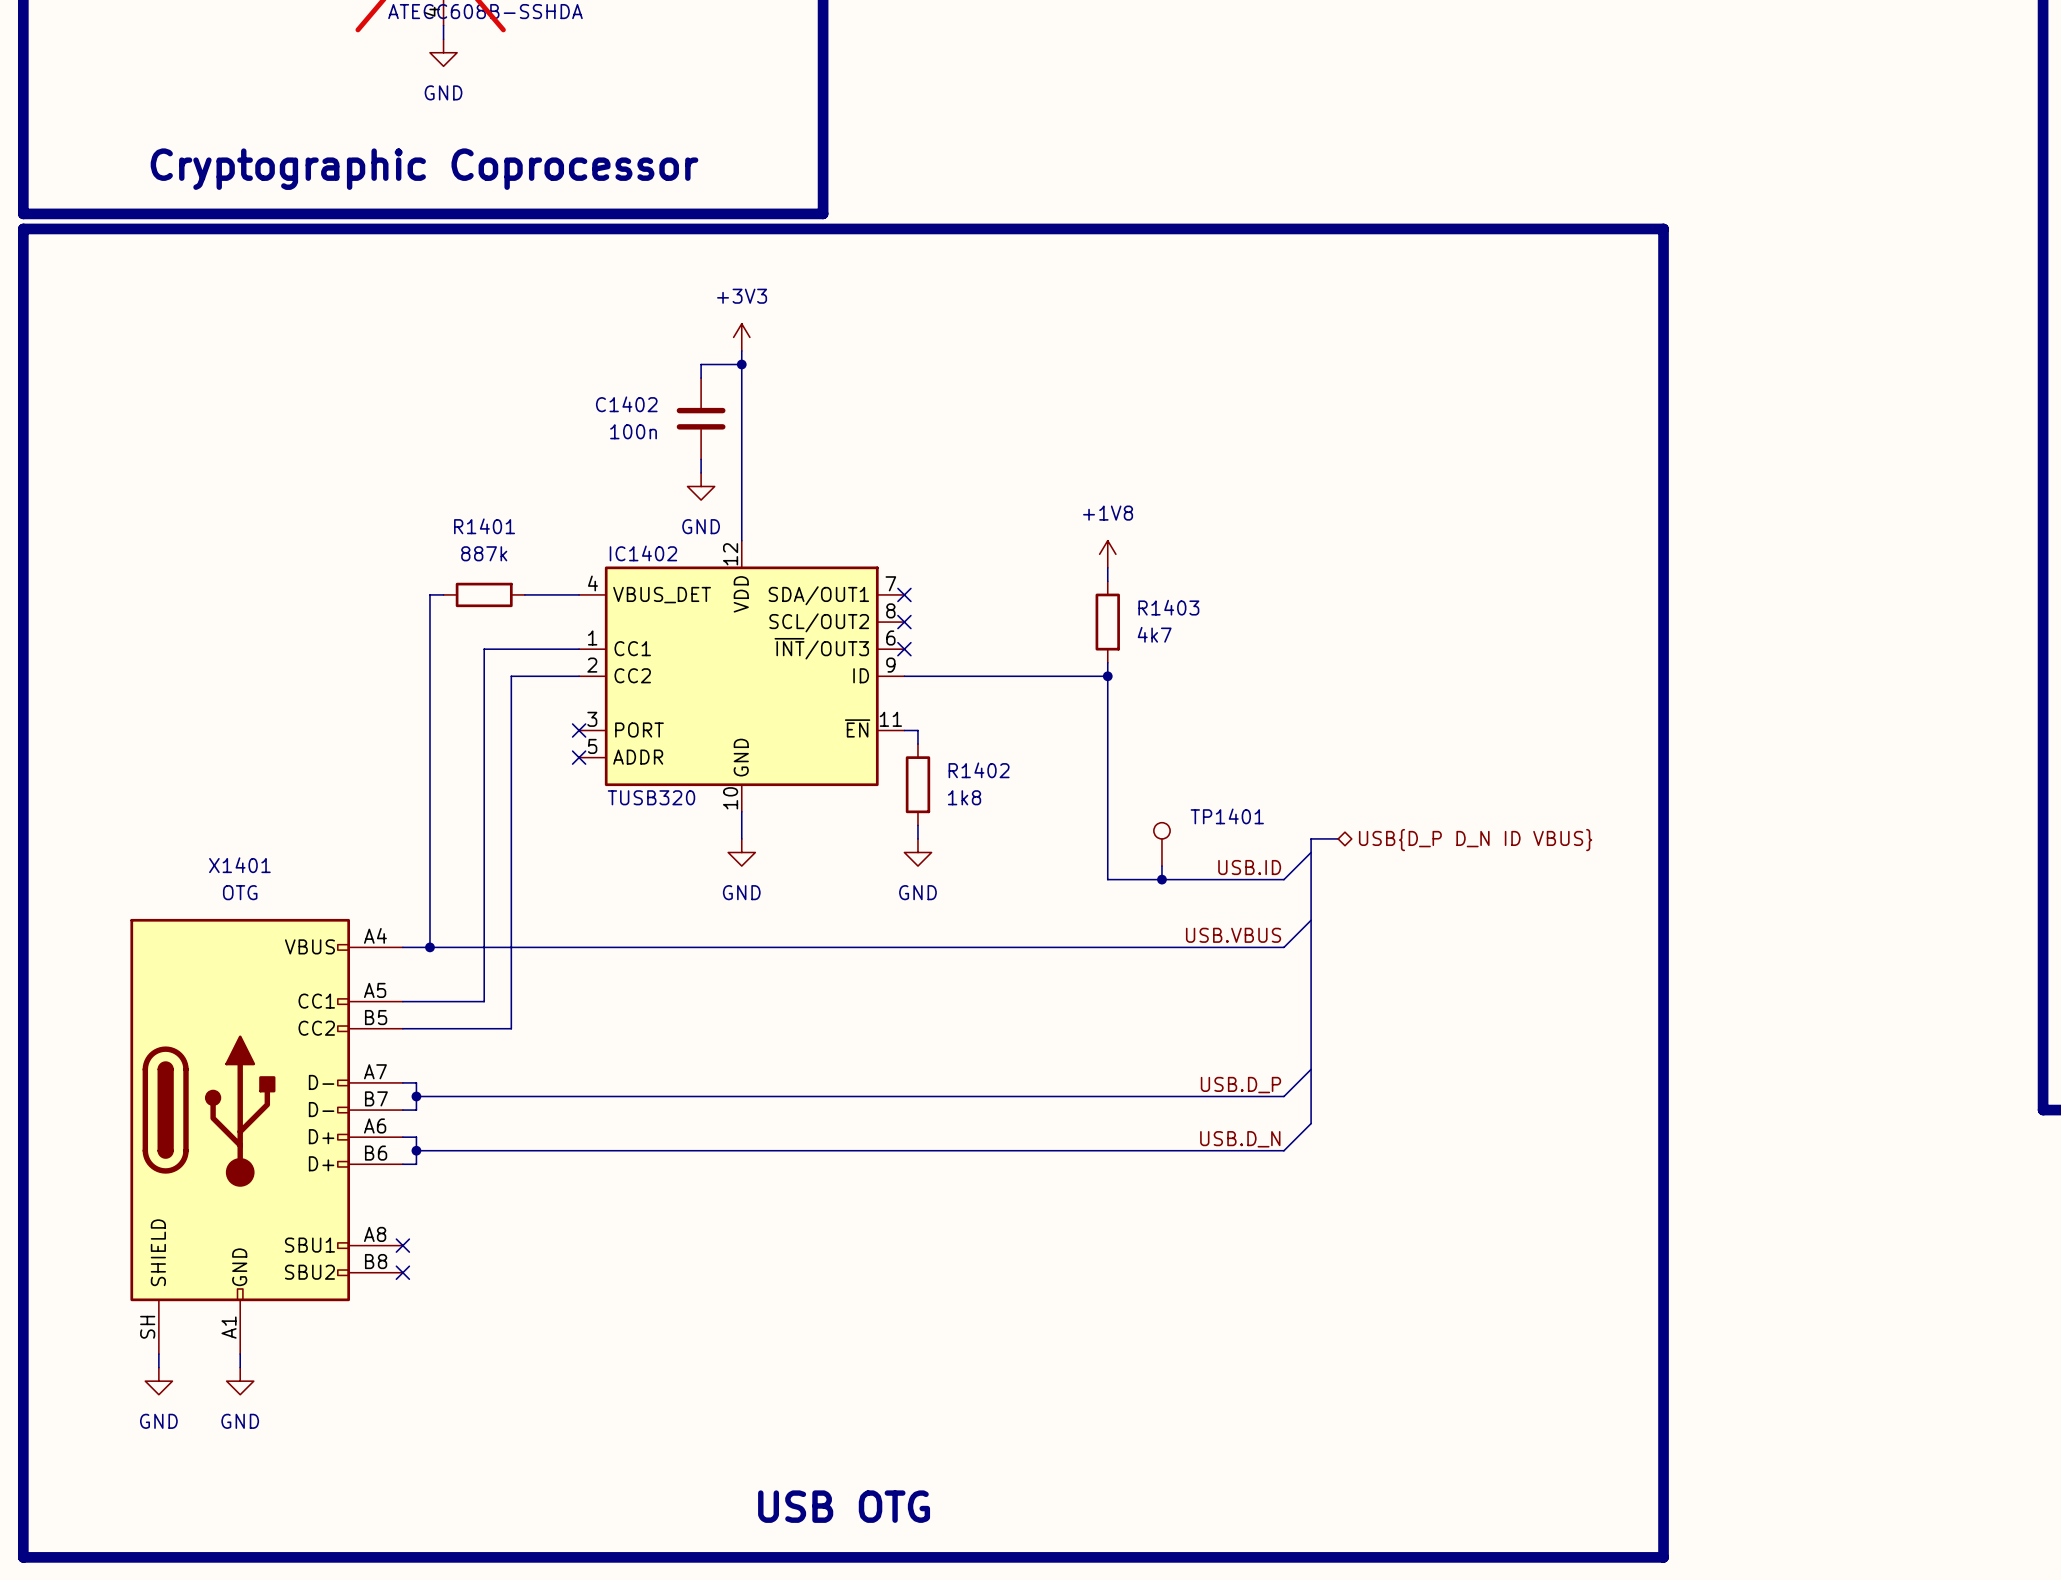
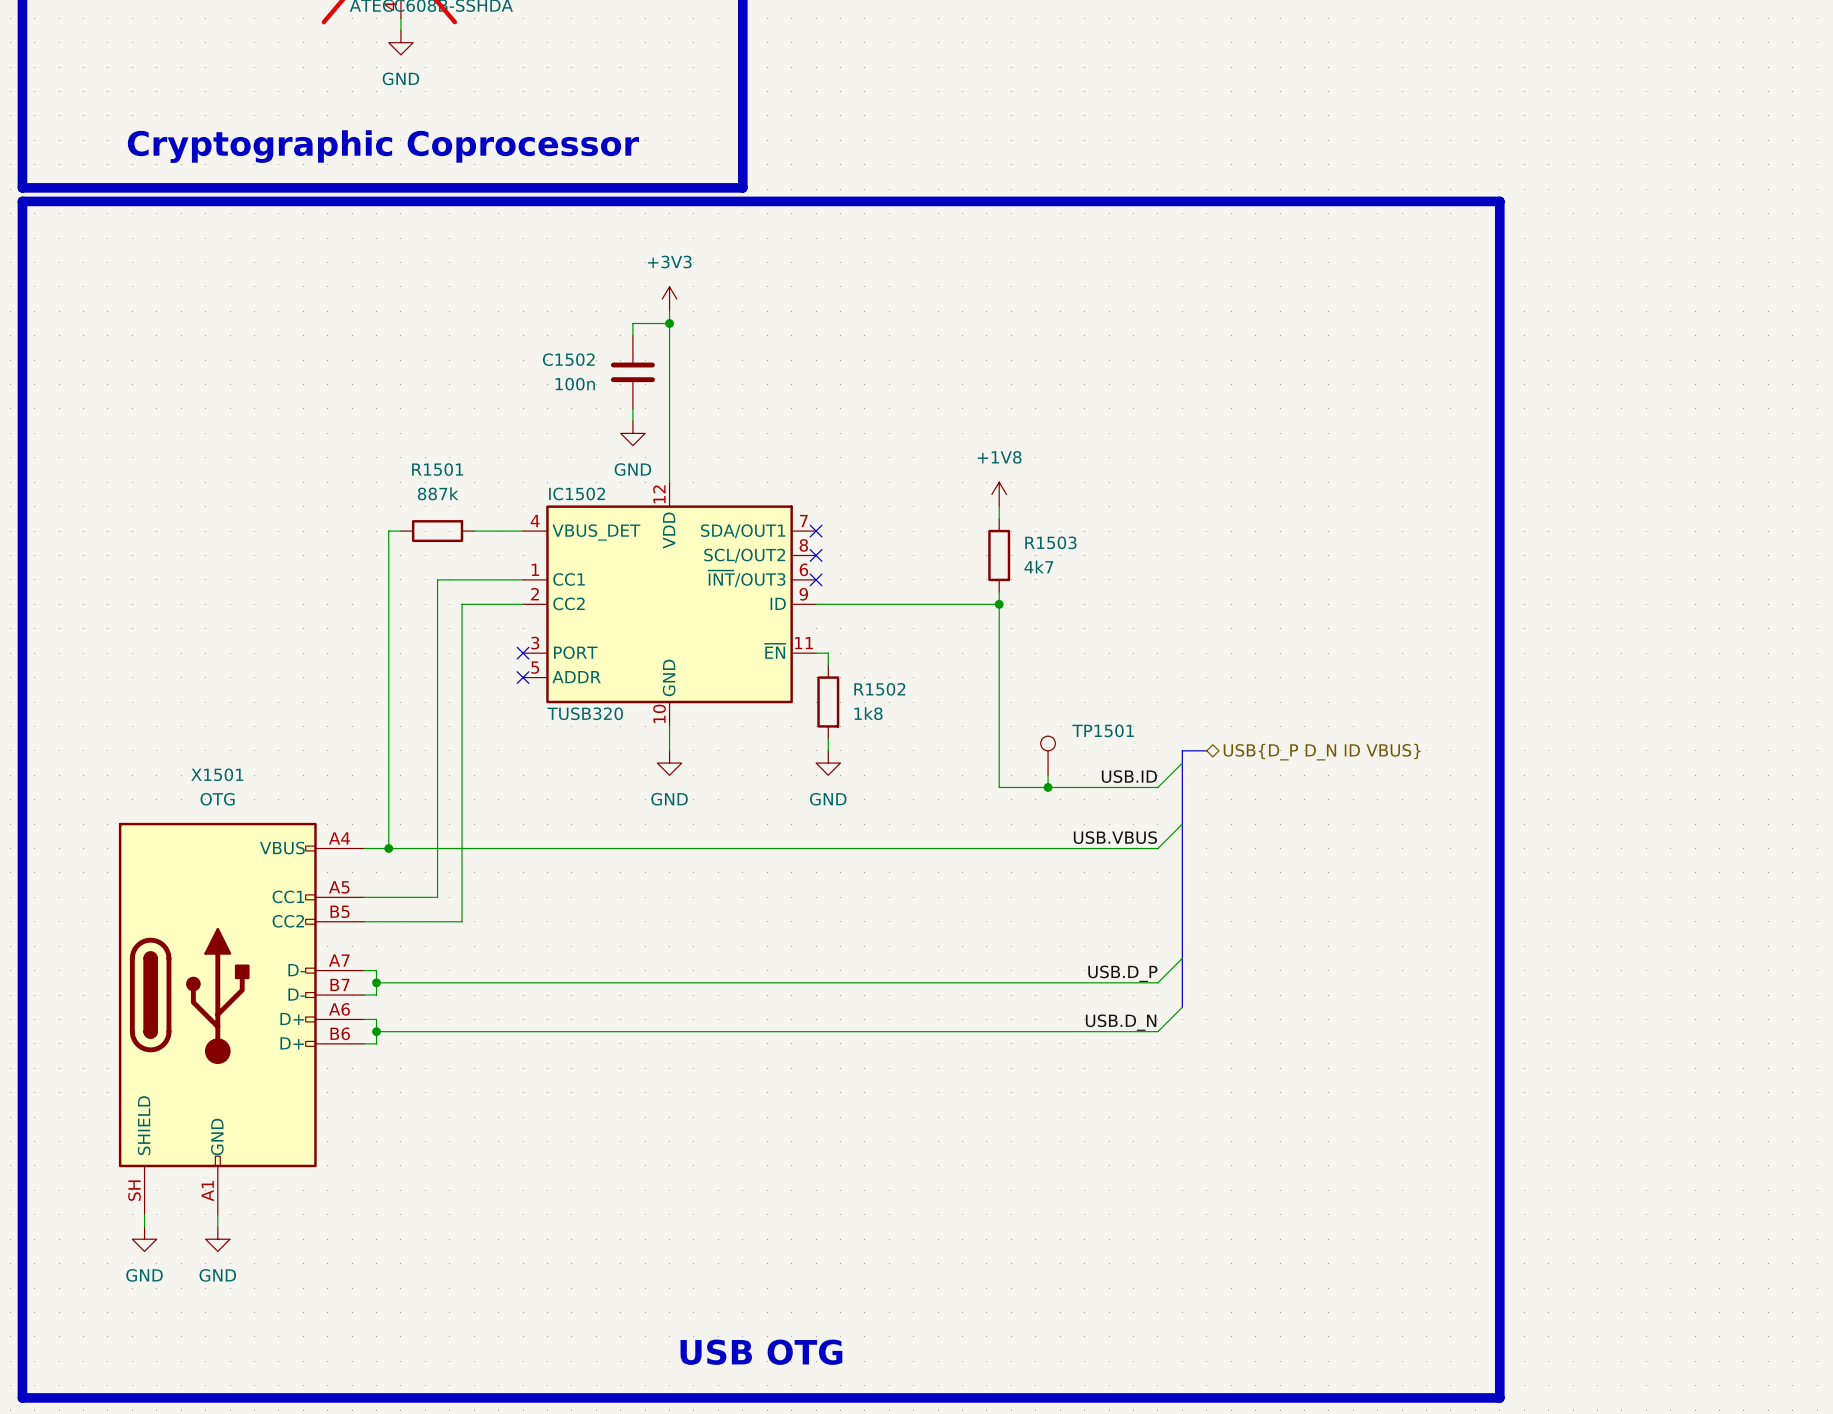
C1402 name: C1402 (626, 404) -> C1502 (568, 359)
R1401 name: R1401 (484, 526) -> R1501 (437, 469)
IC1402 name: IC1402 (643, 553) -> IC1502 (577, 493)
R1403 name: R1403 (1168, 607) -> R1503 (1050, 542)
R1402 name: R1402 (979, 770) -> R1502 (879, 689)
TP1401 name: TP1401 (1227, 816) -> TP1501 (1103, 730)
X1401: OTG (266, 1136) -> none
X1501: none -> OTG (241, 1018)
no-connect mark: (402, 1245) -> none
no-connect mark: (402, 1272) -> none

